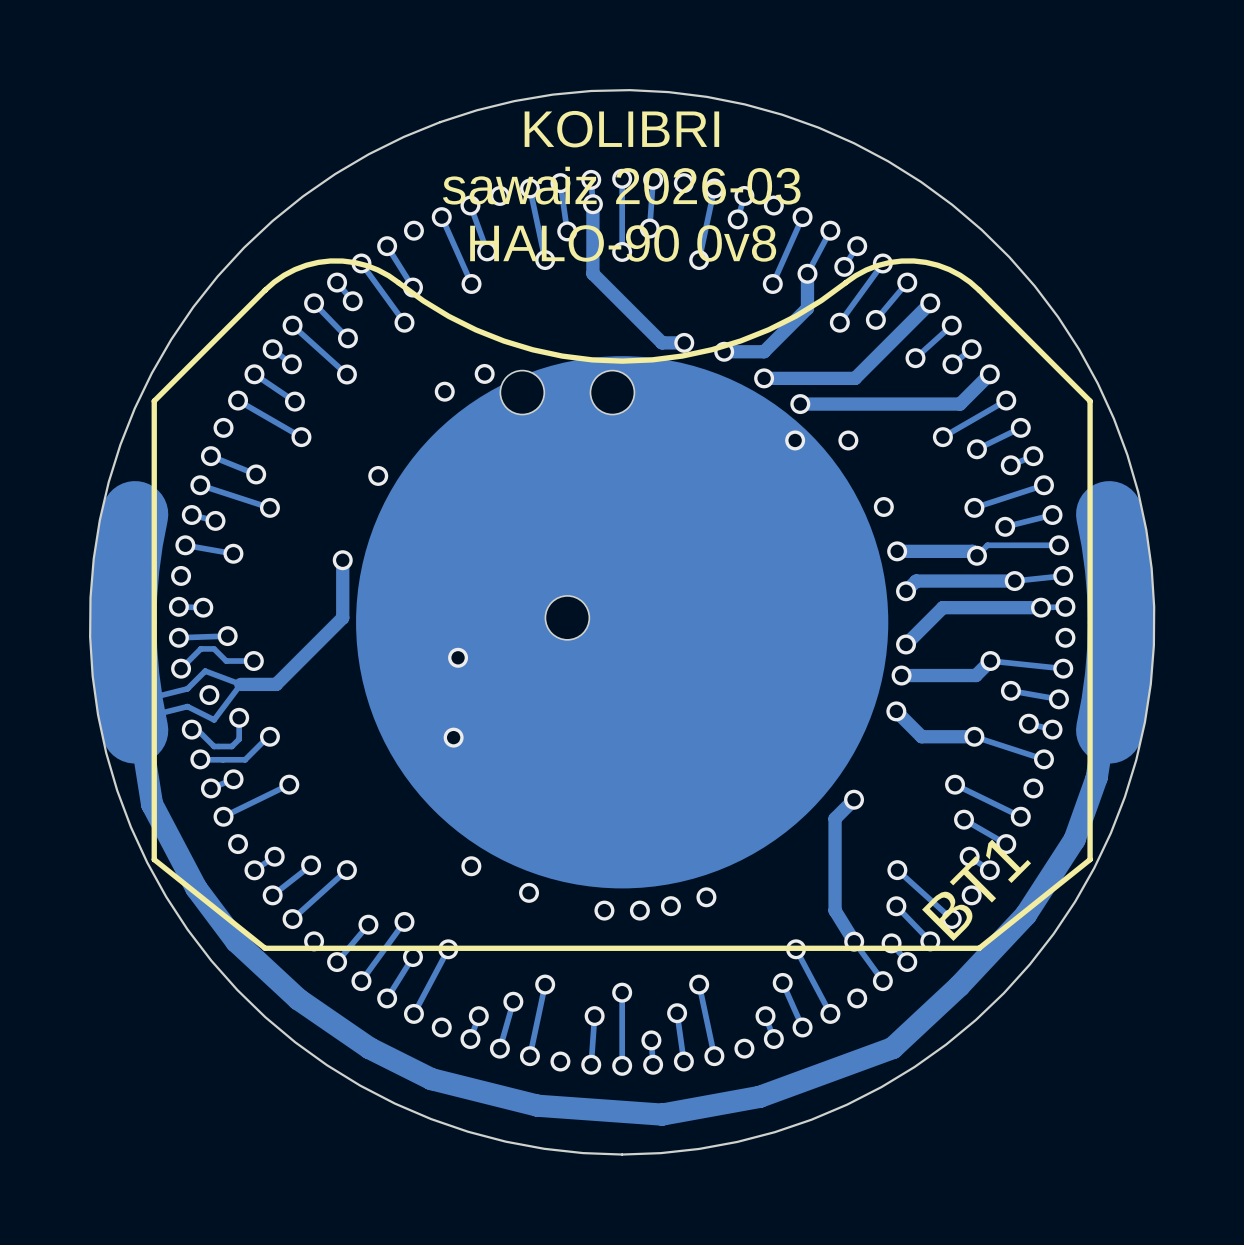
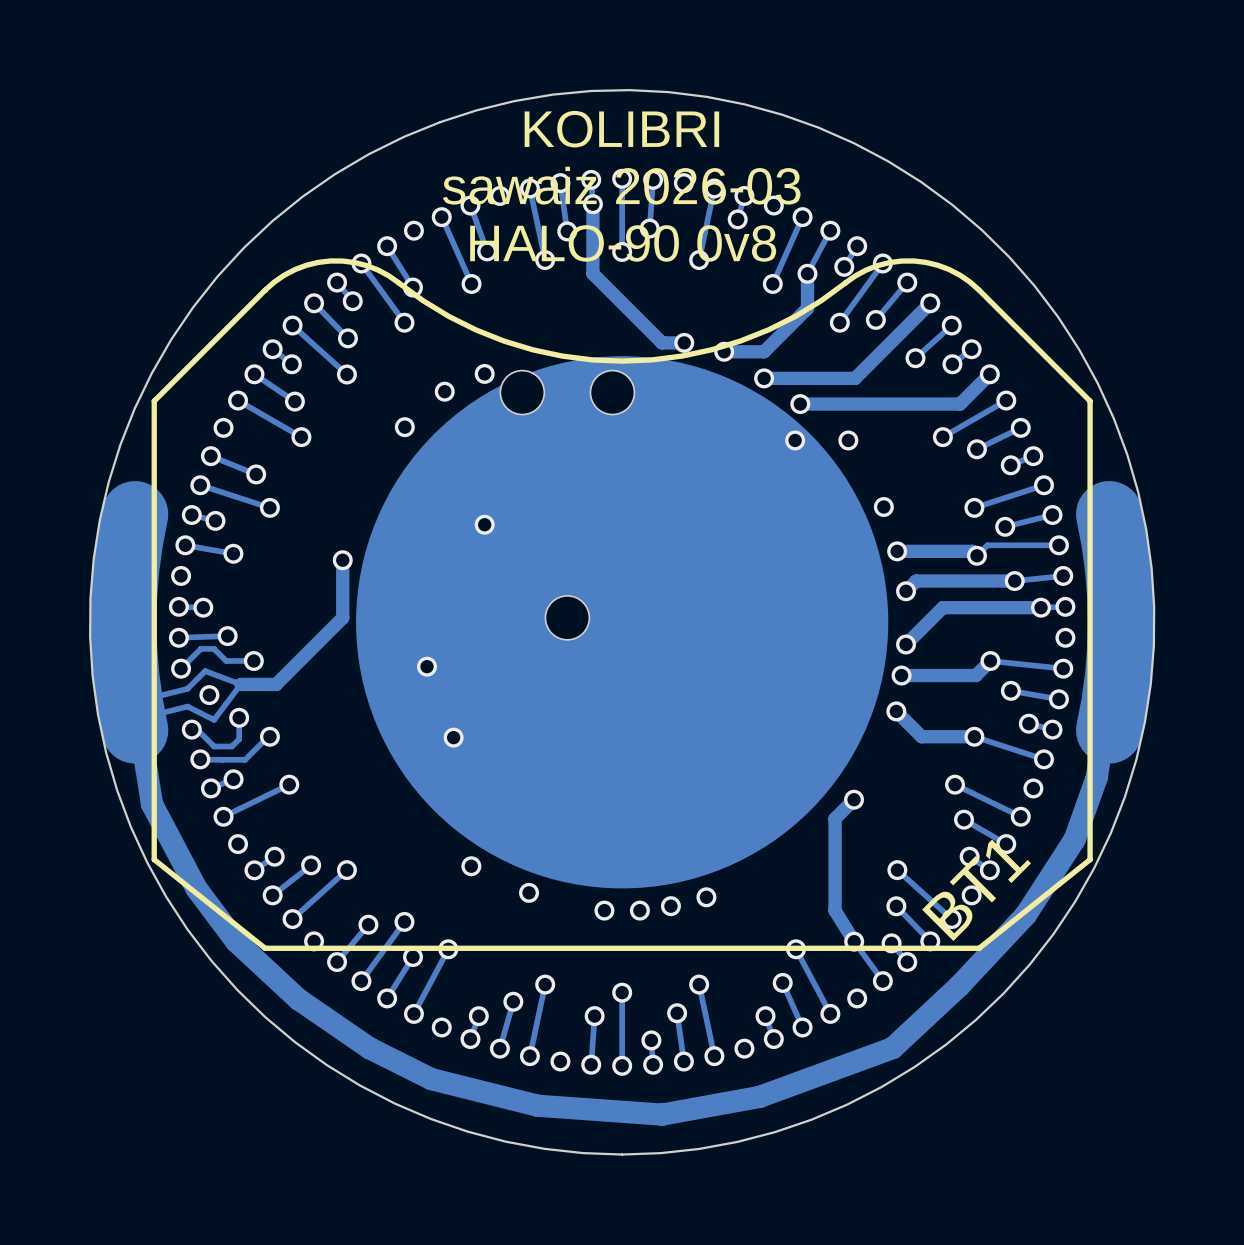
via position: (378, 475) -> (404, 427)
via: none -> (484, 524)
via position: (458, 657) -> (427, 666)

